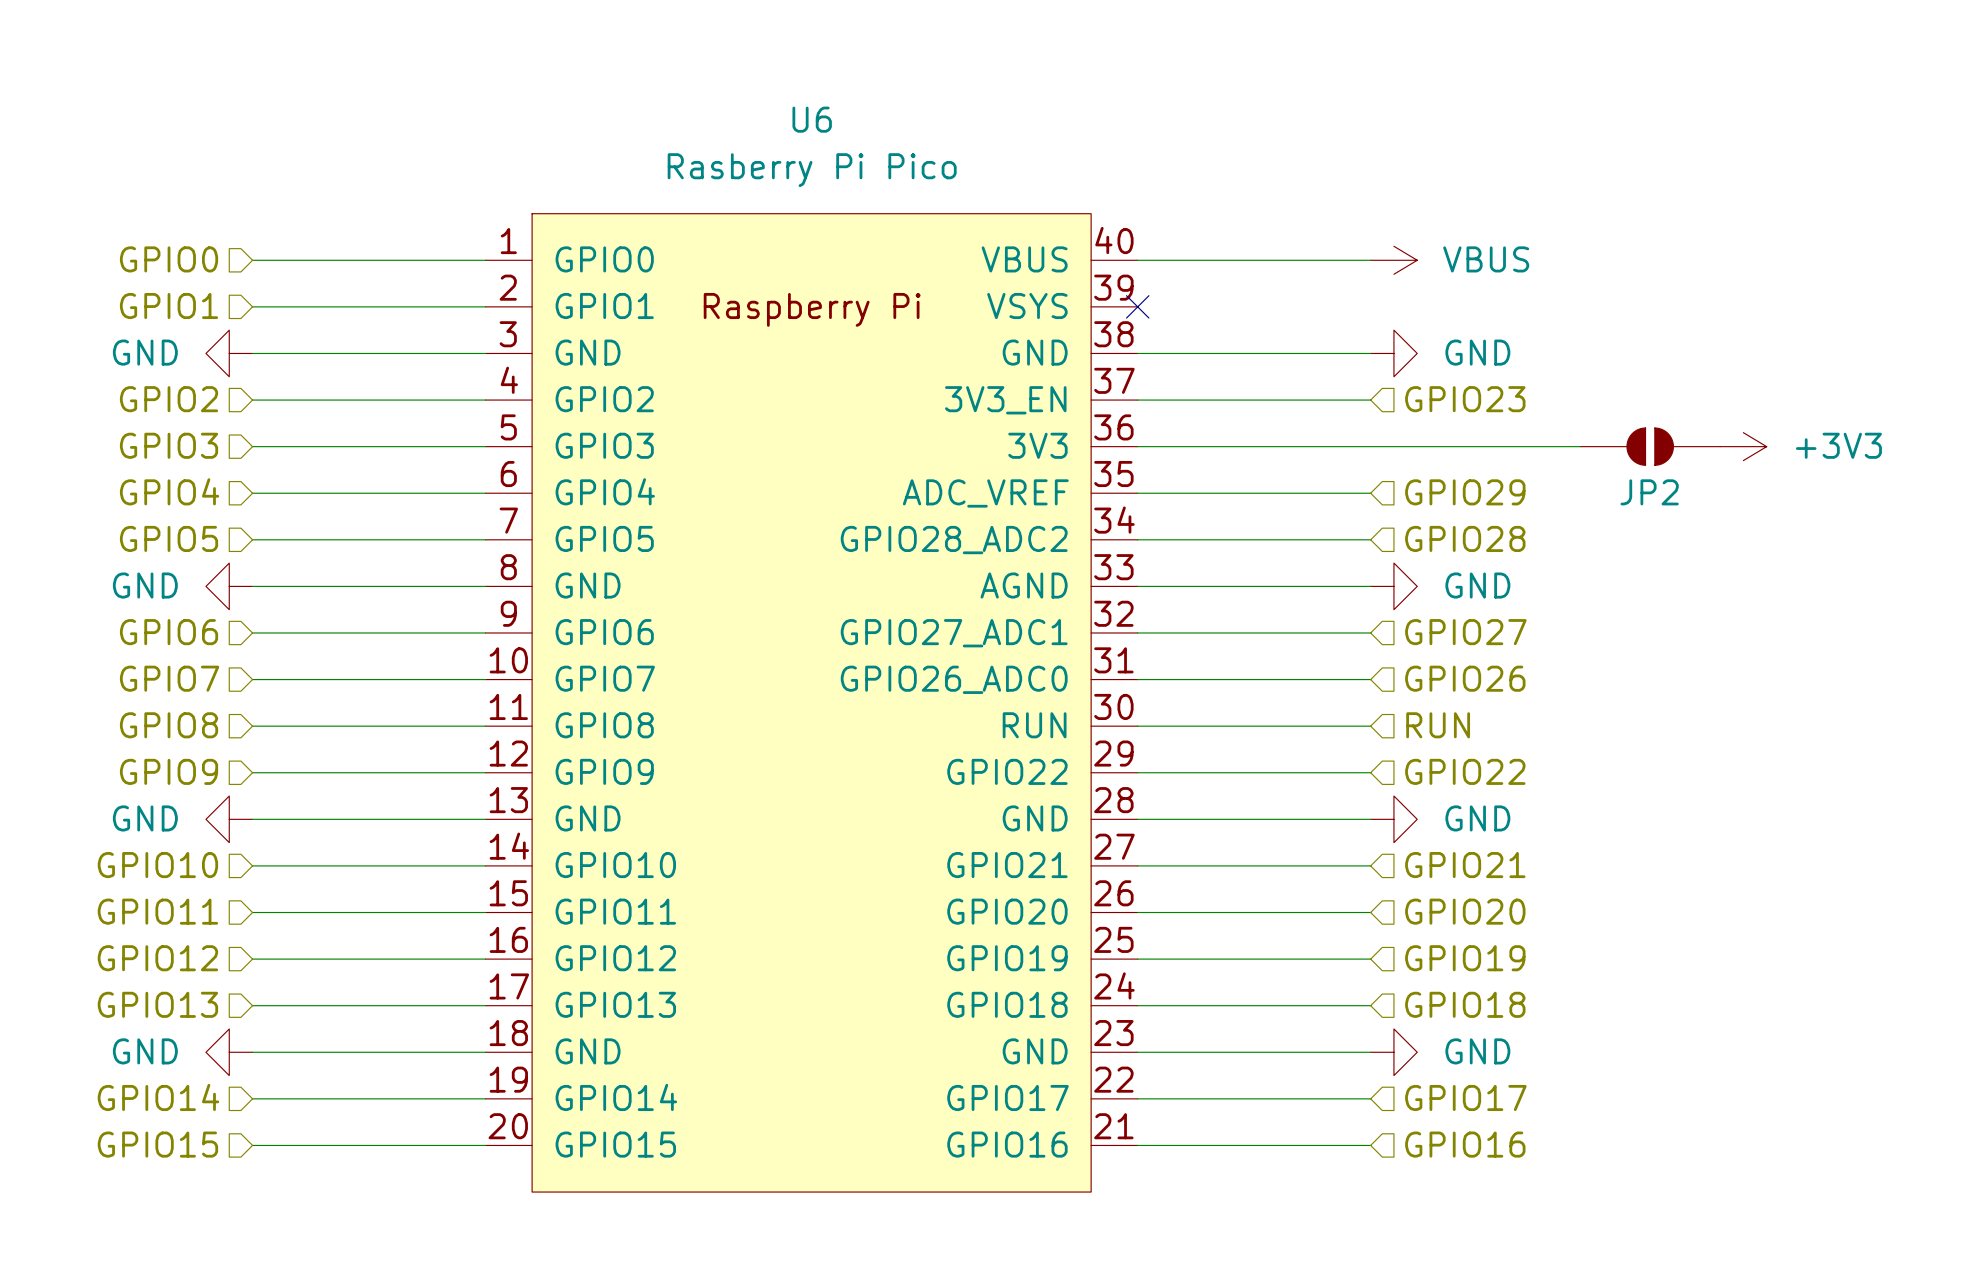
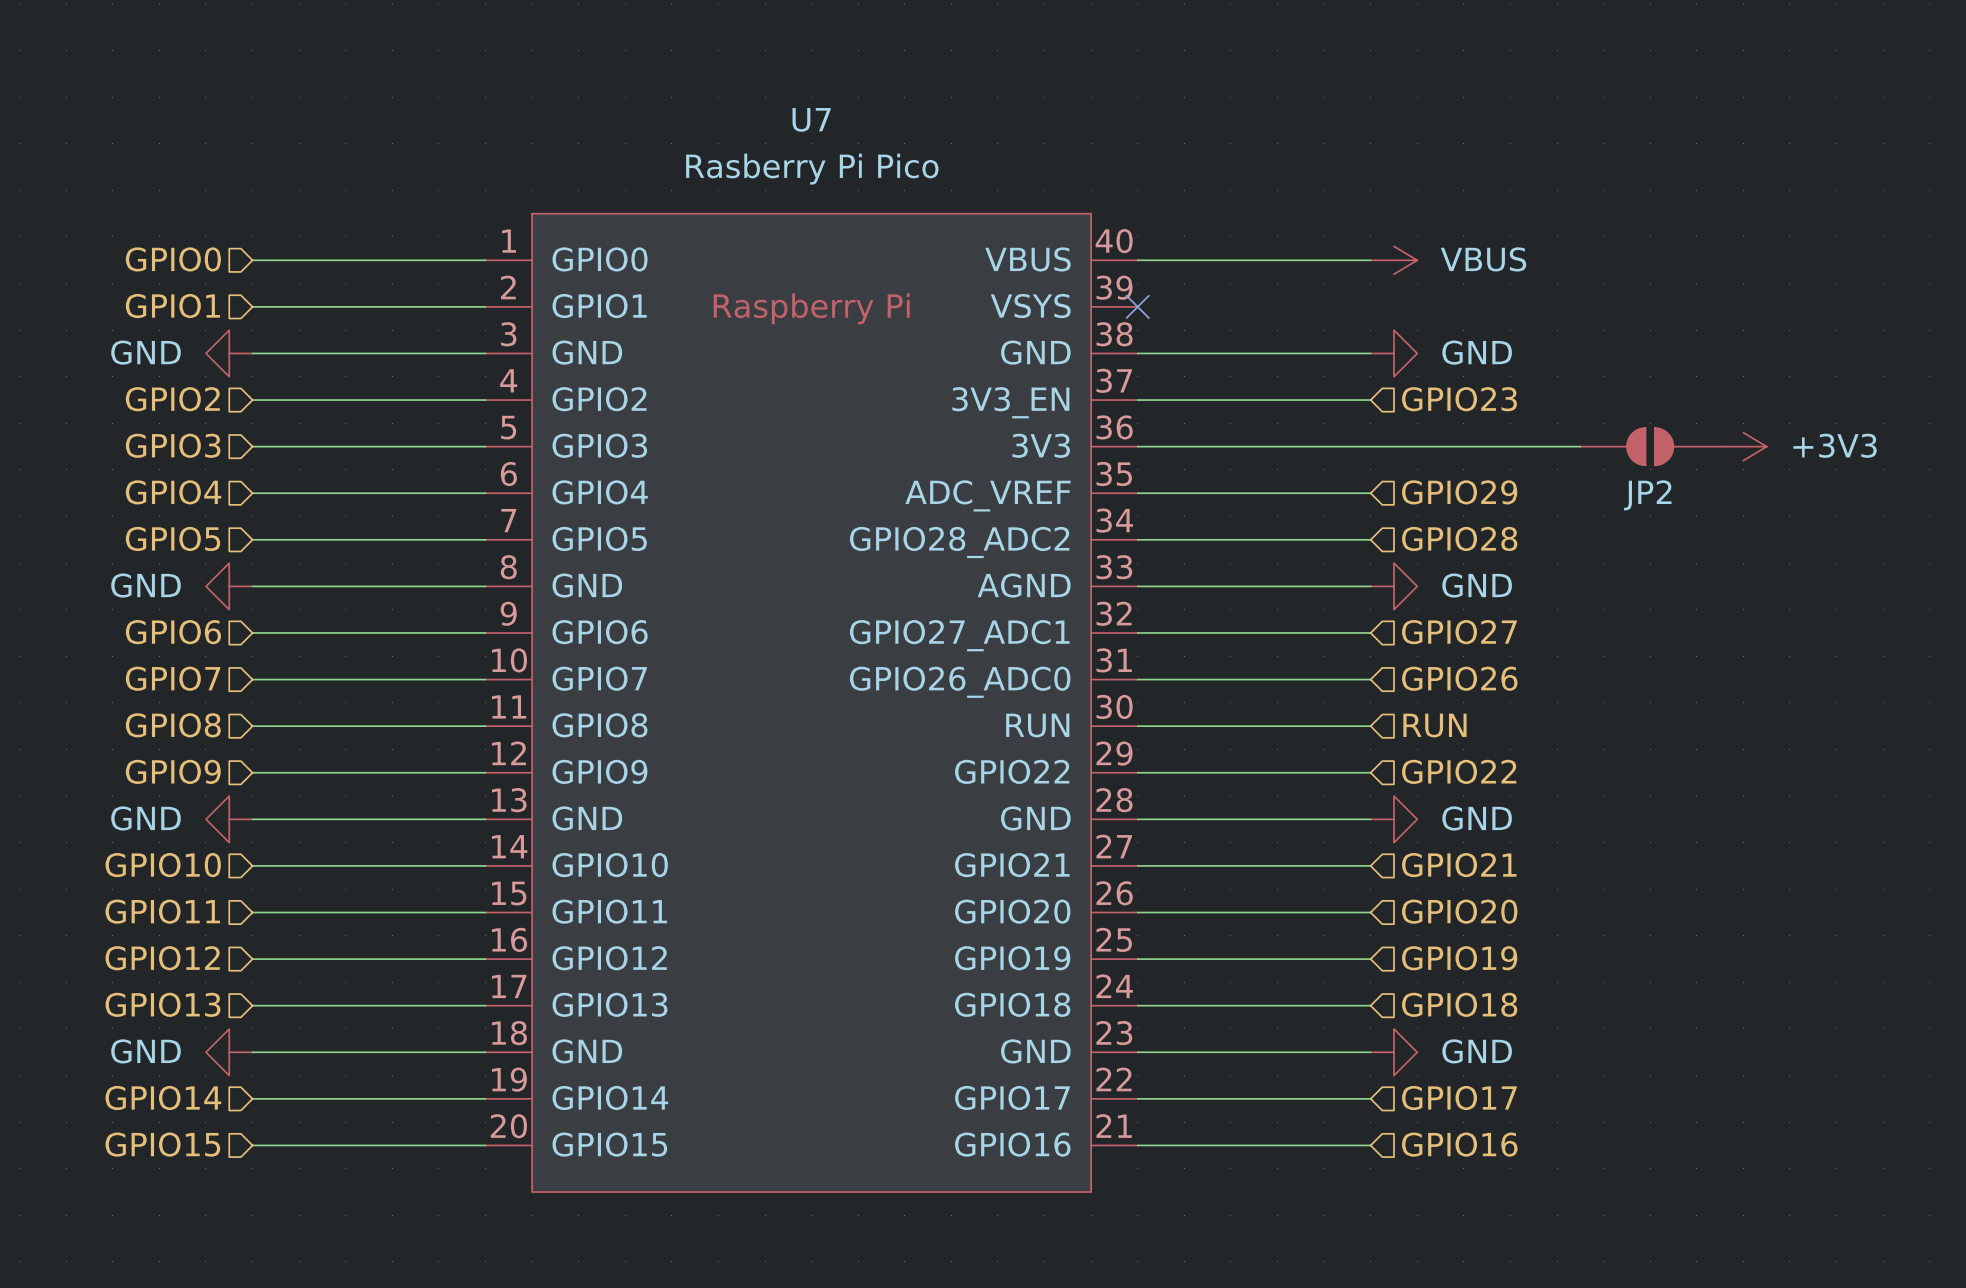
U6 name: U6 (812, 119) -> U7 (811, 119)

